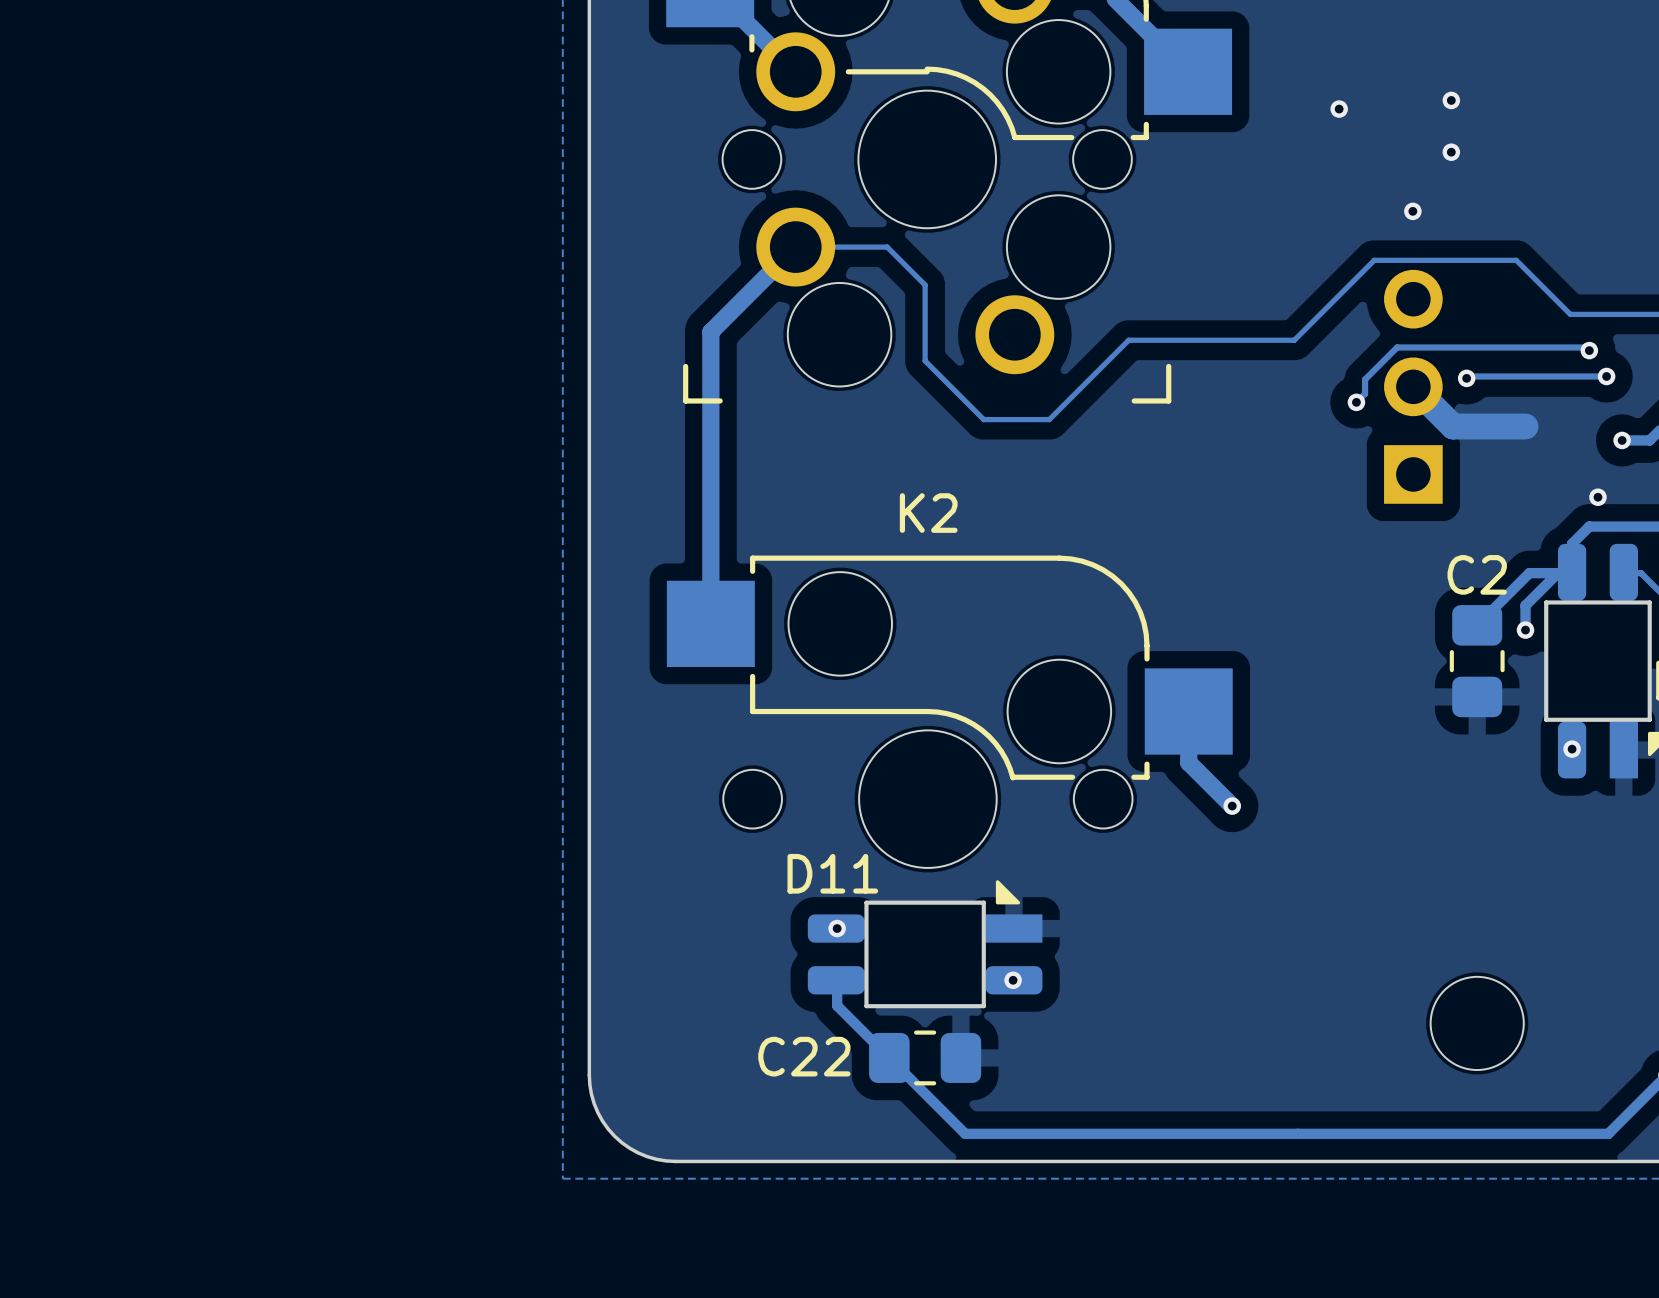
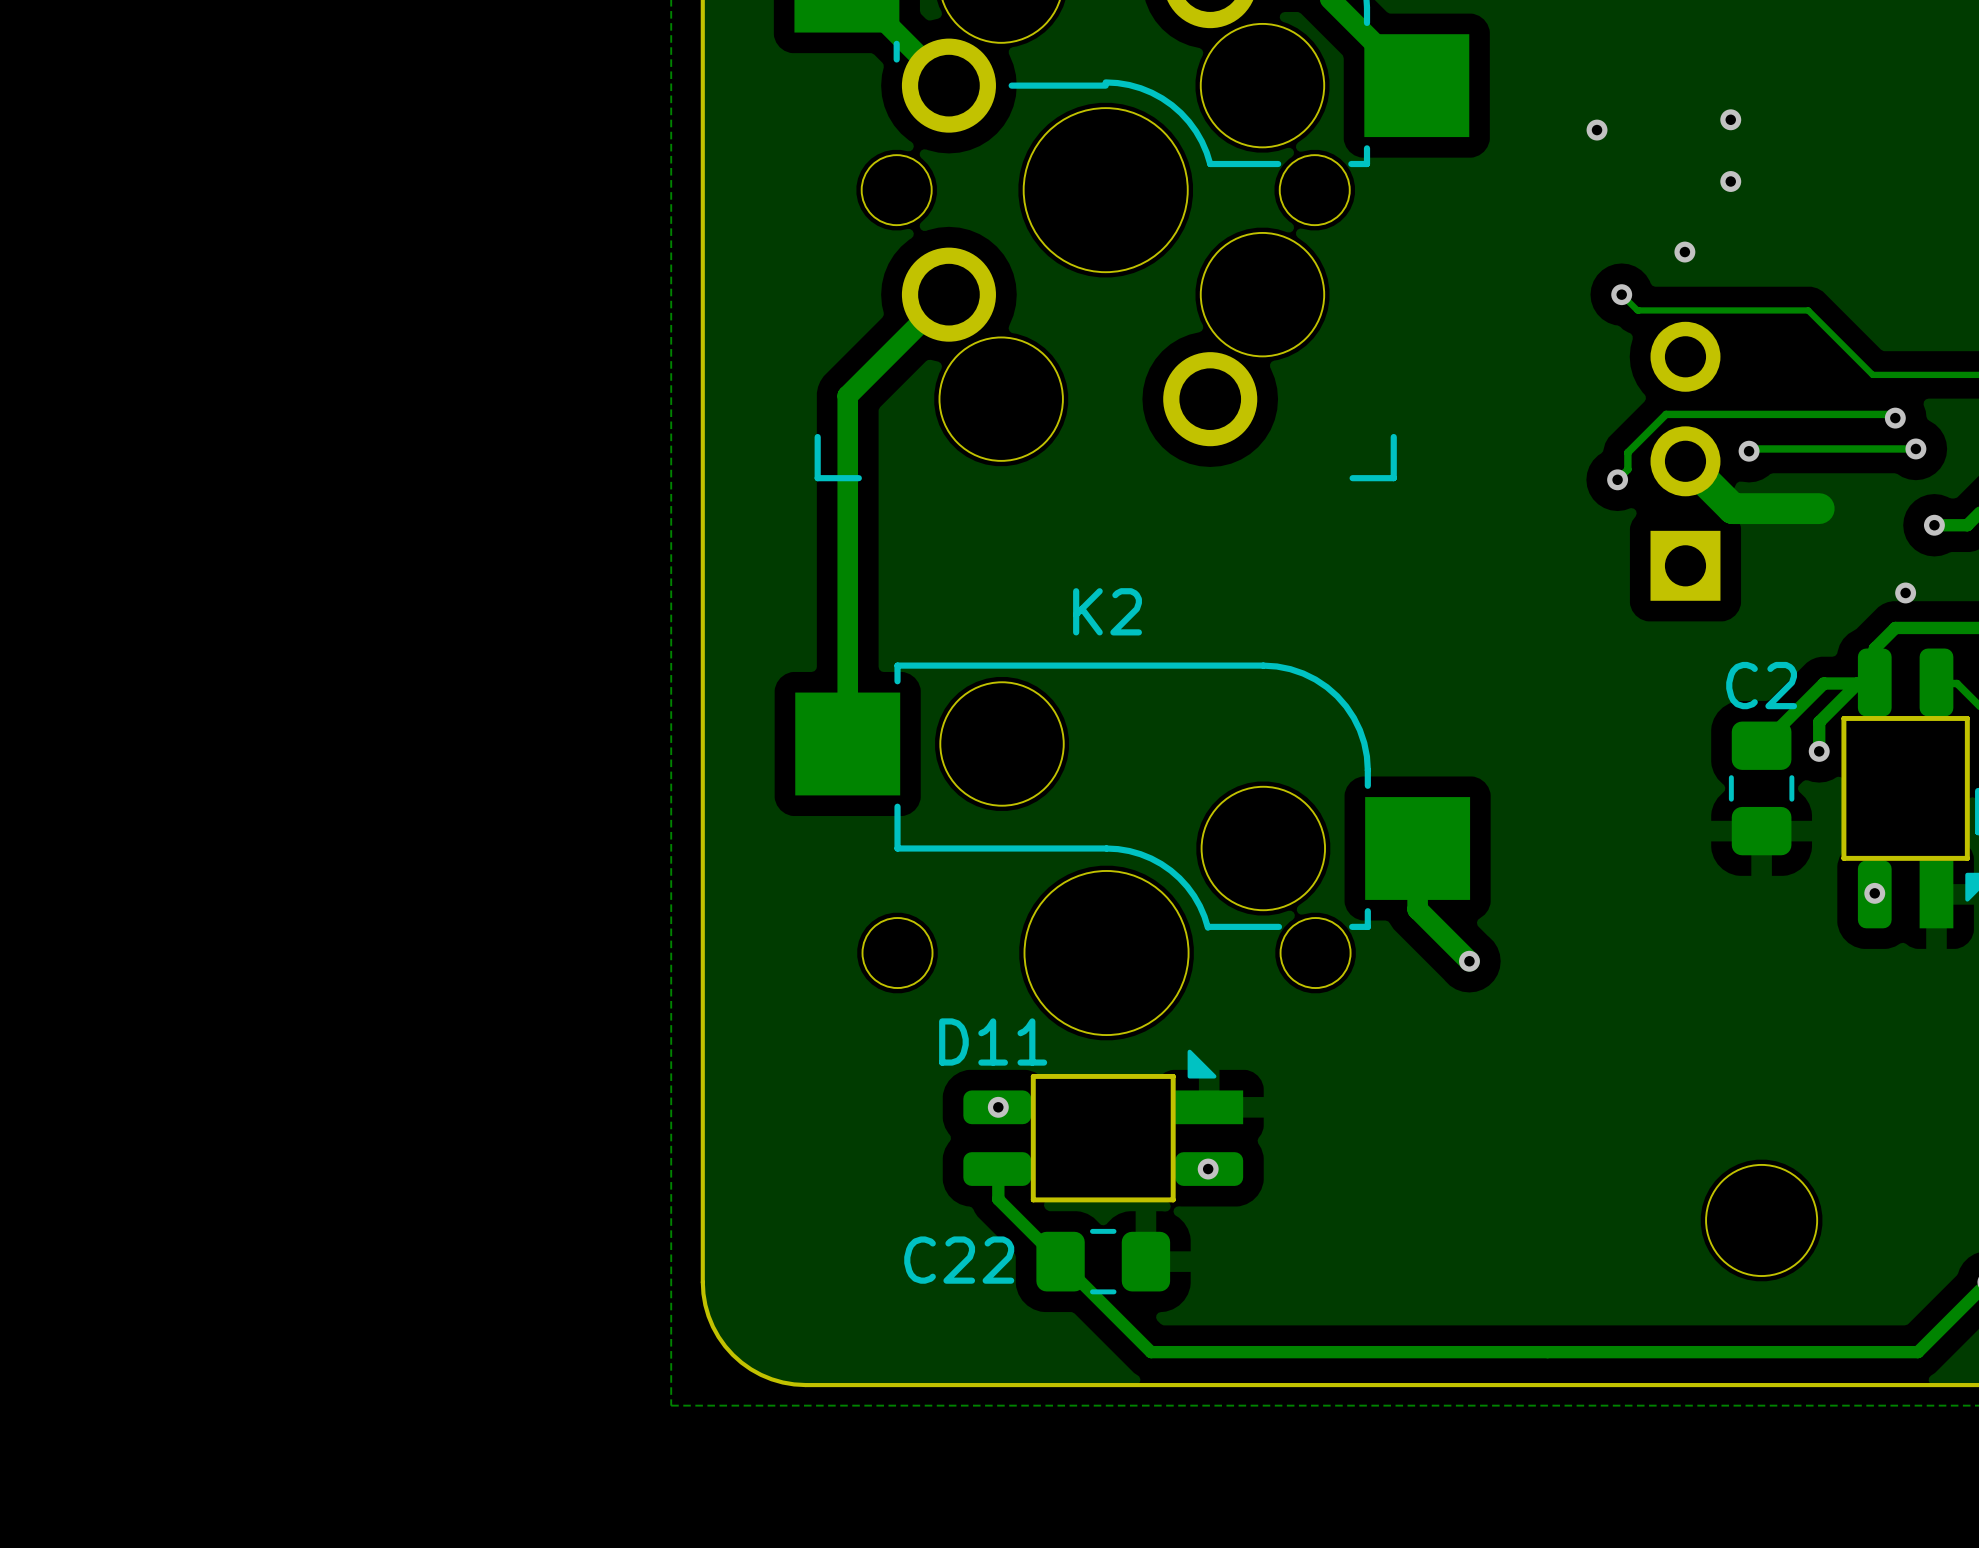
track: (795, 247) (887, 247) (925, 285) (925, 360) (983, 419) (1049, 419) (1128, 340) (1294, 340) (1374, 260) -> (1621, 294) (1638, 310)
via: none -> (1621, 294)

